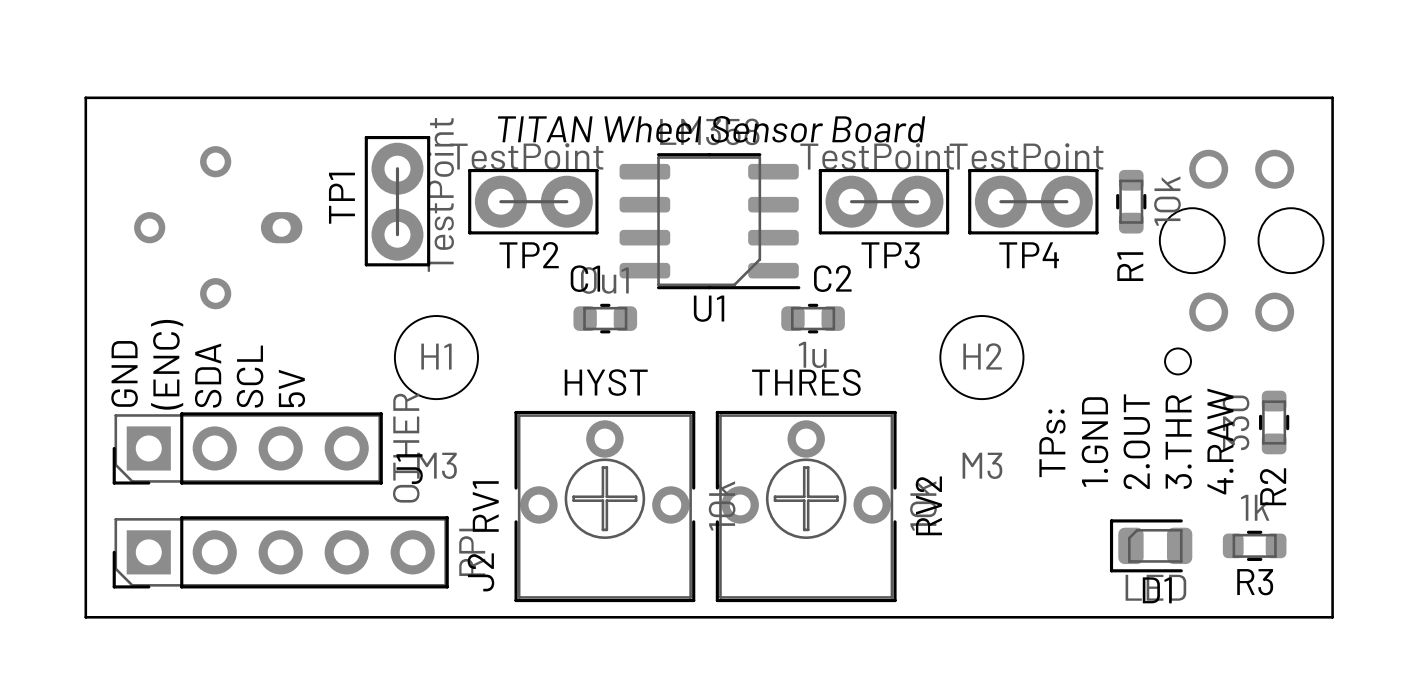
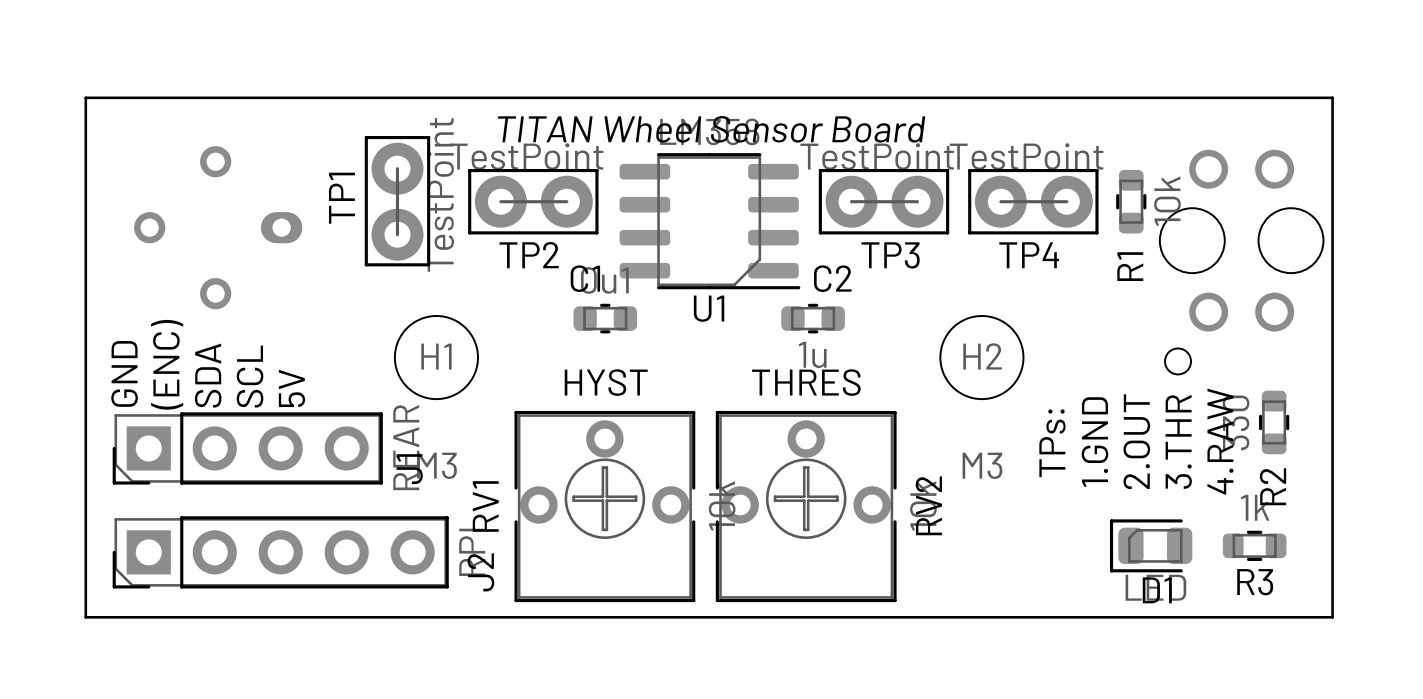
J1 value: OTHER (406, 448) -> REAR (406, 447)

